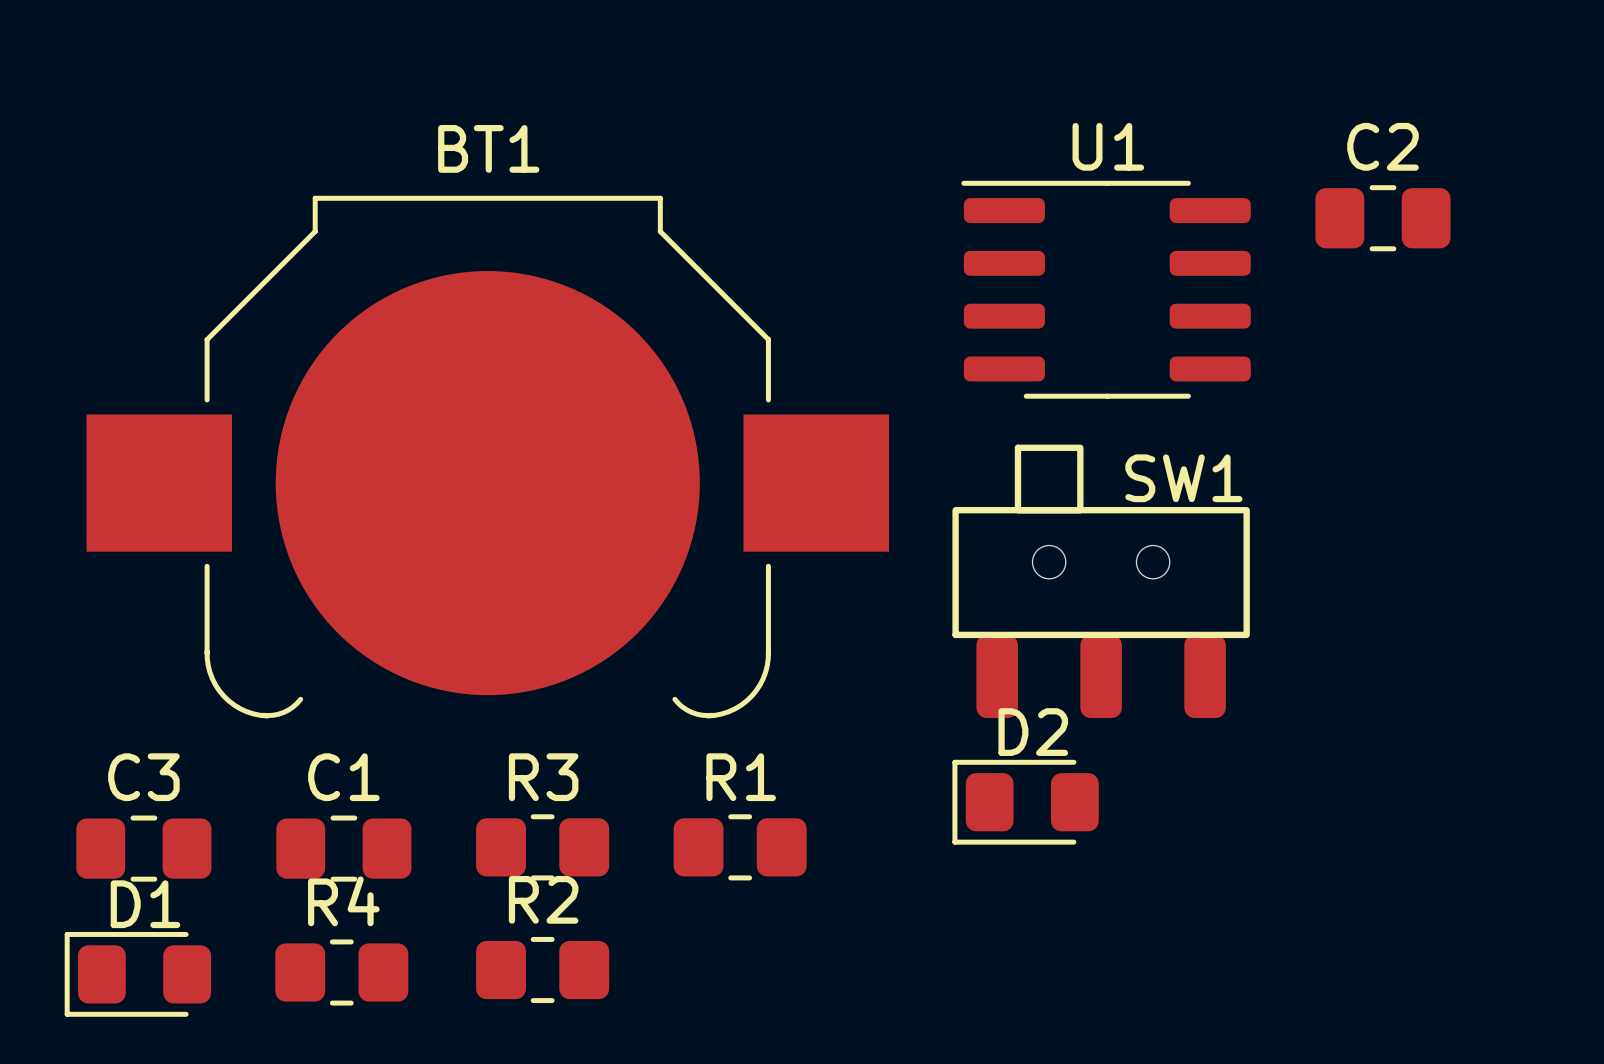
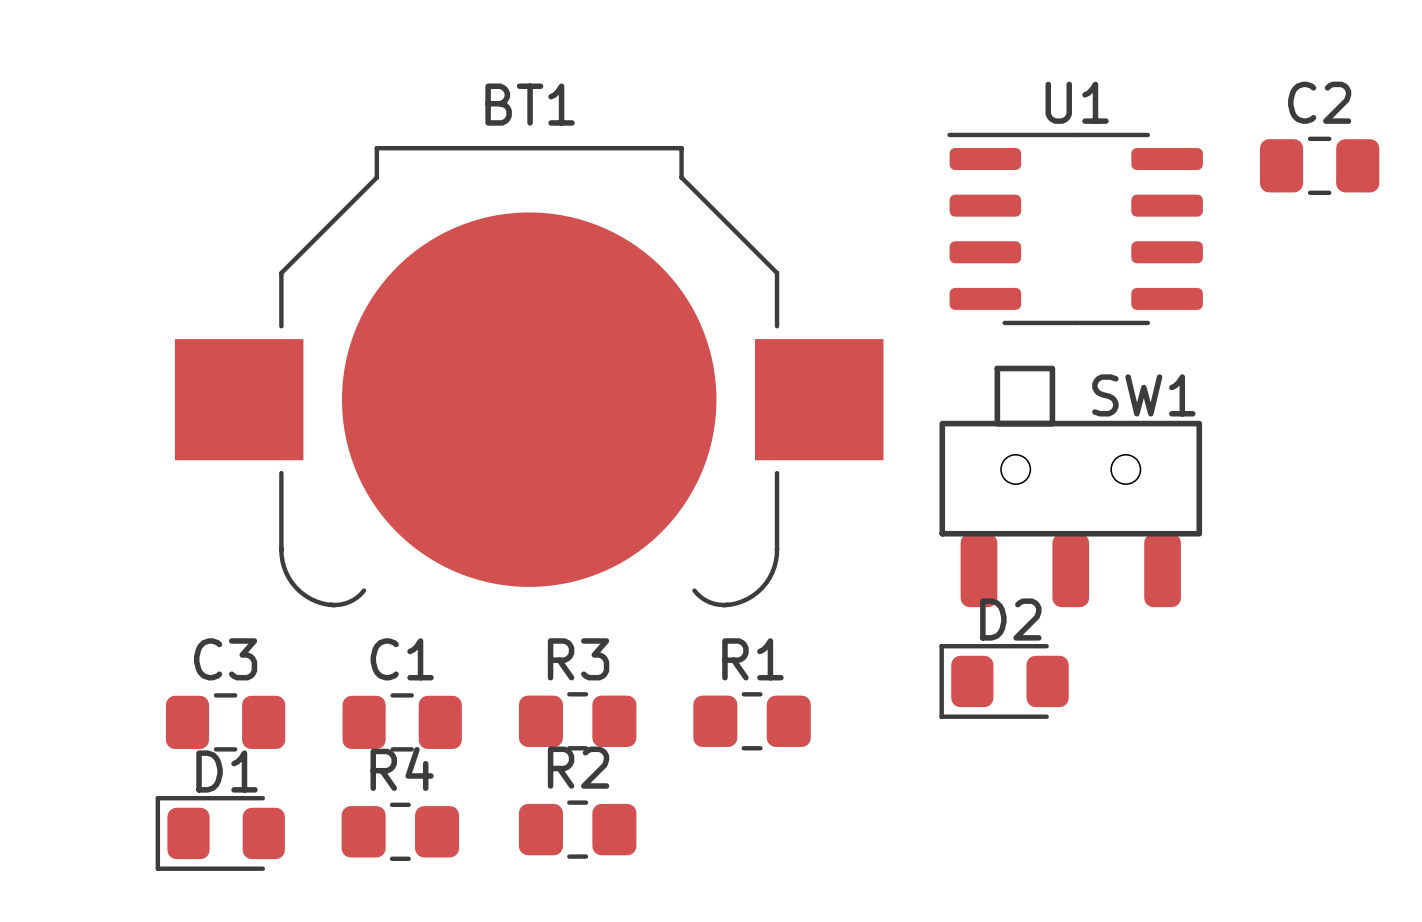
SW1 footprint: [952, 444, 1250, 719] -> [939, 365, 1203, 608]

